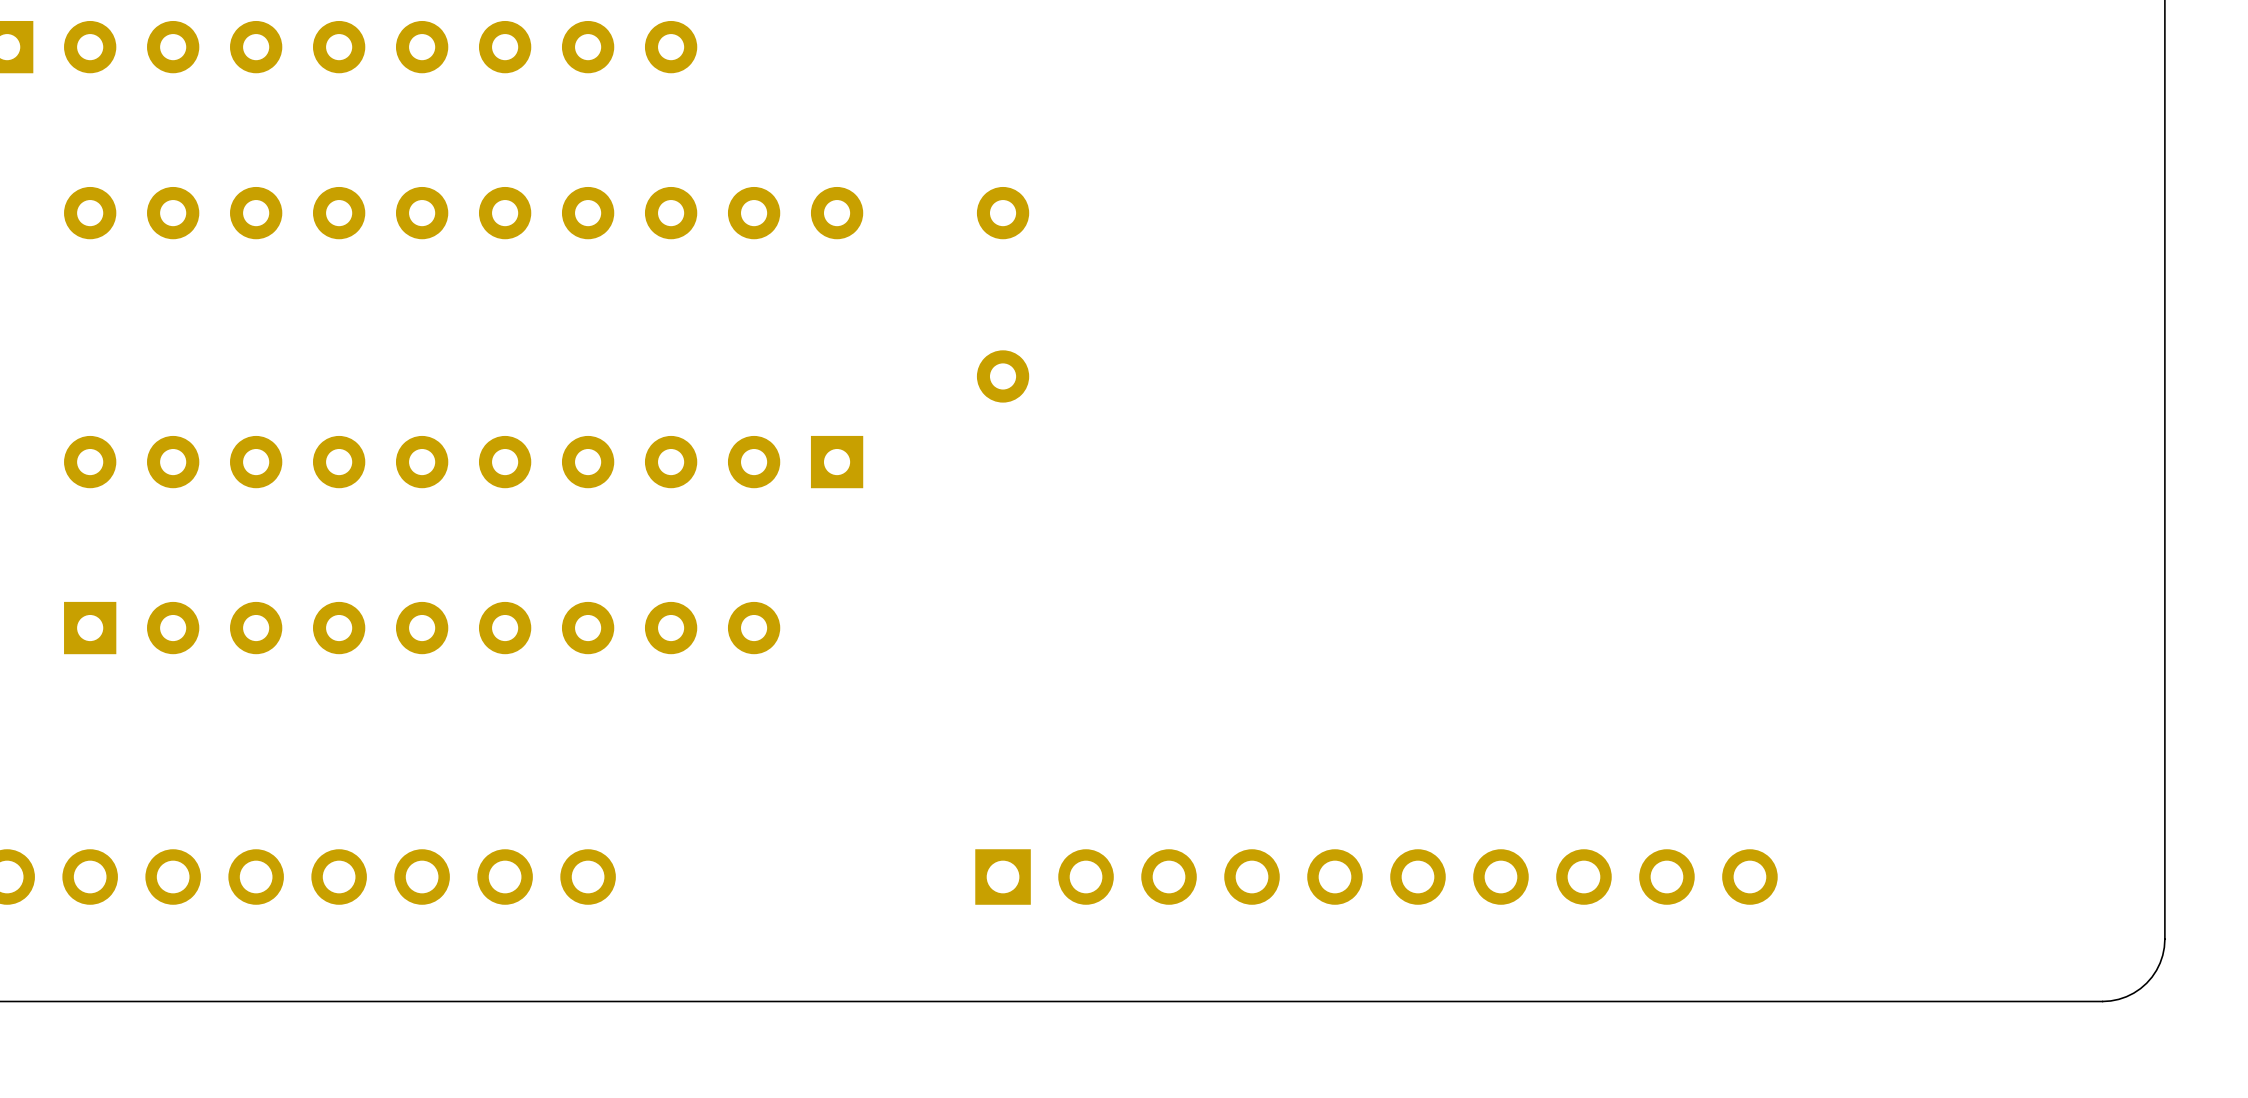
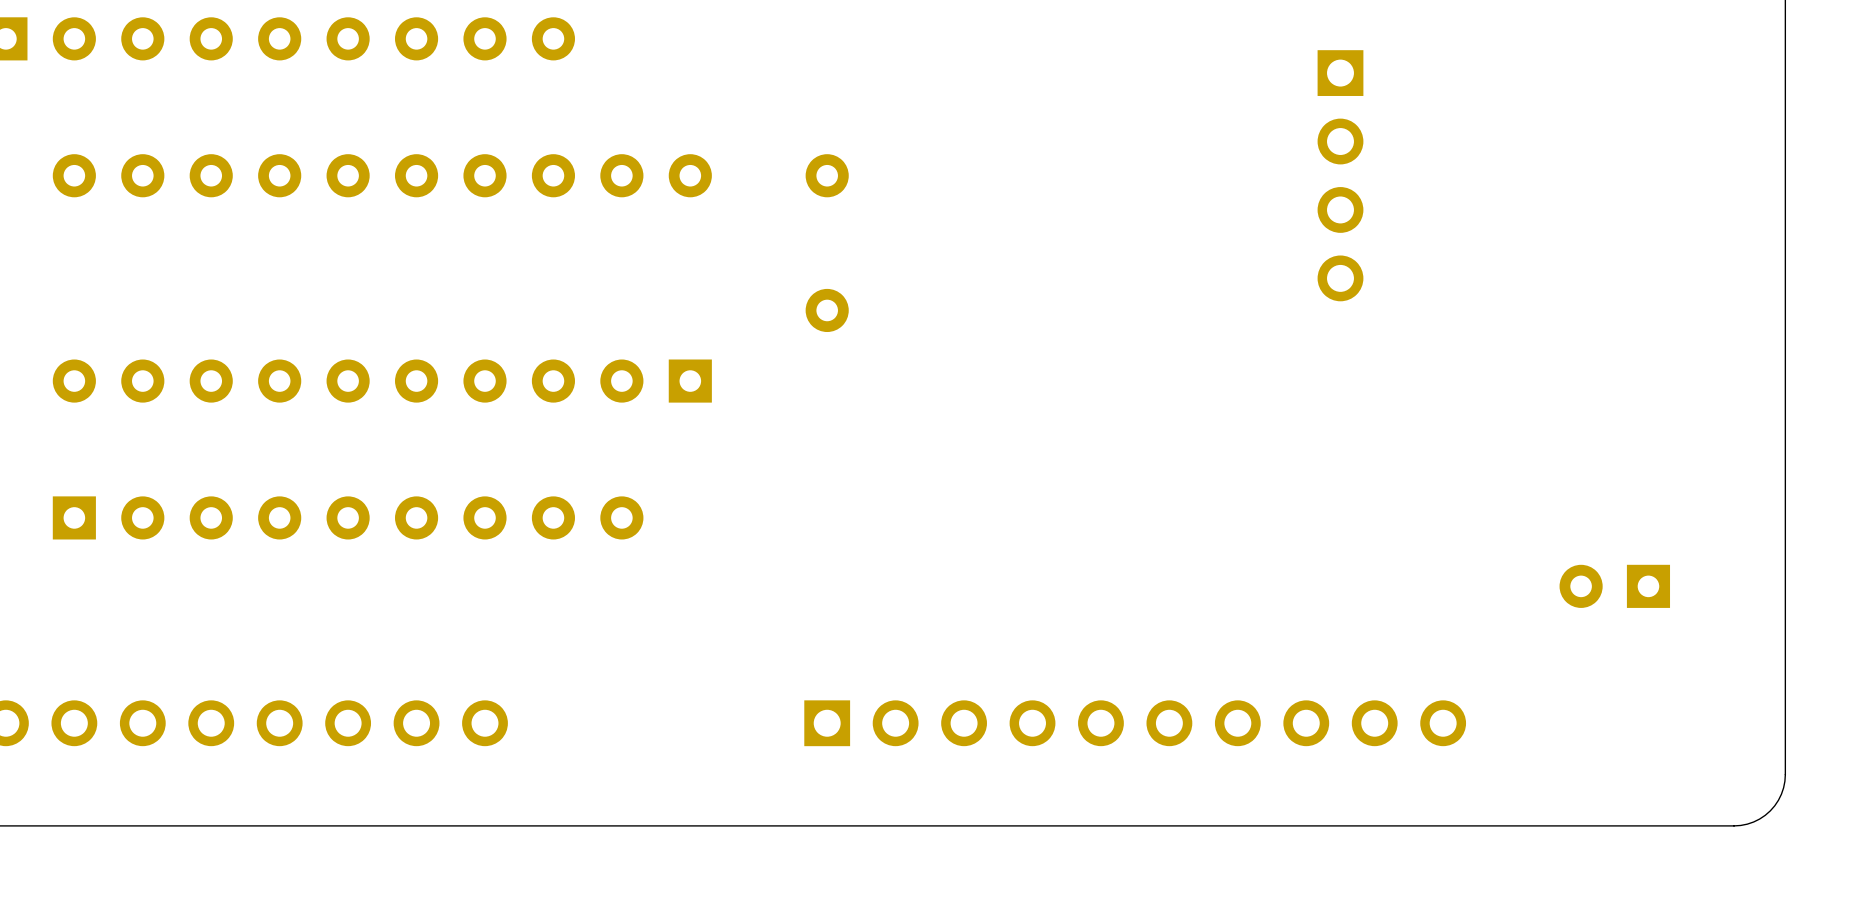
part: none -> (1340, 175)
part: none -> (1614, 586)

